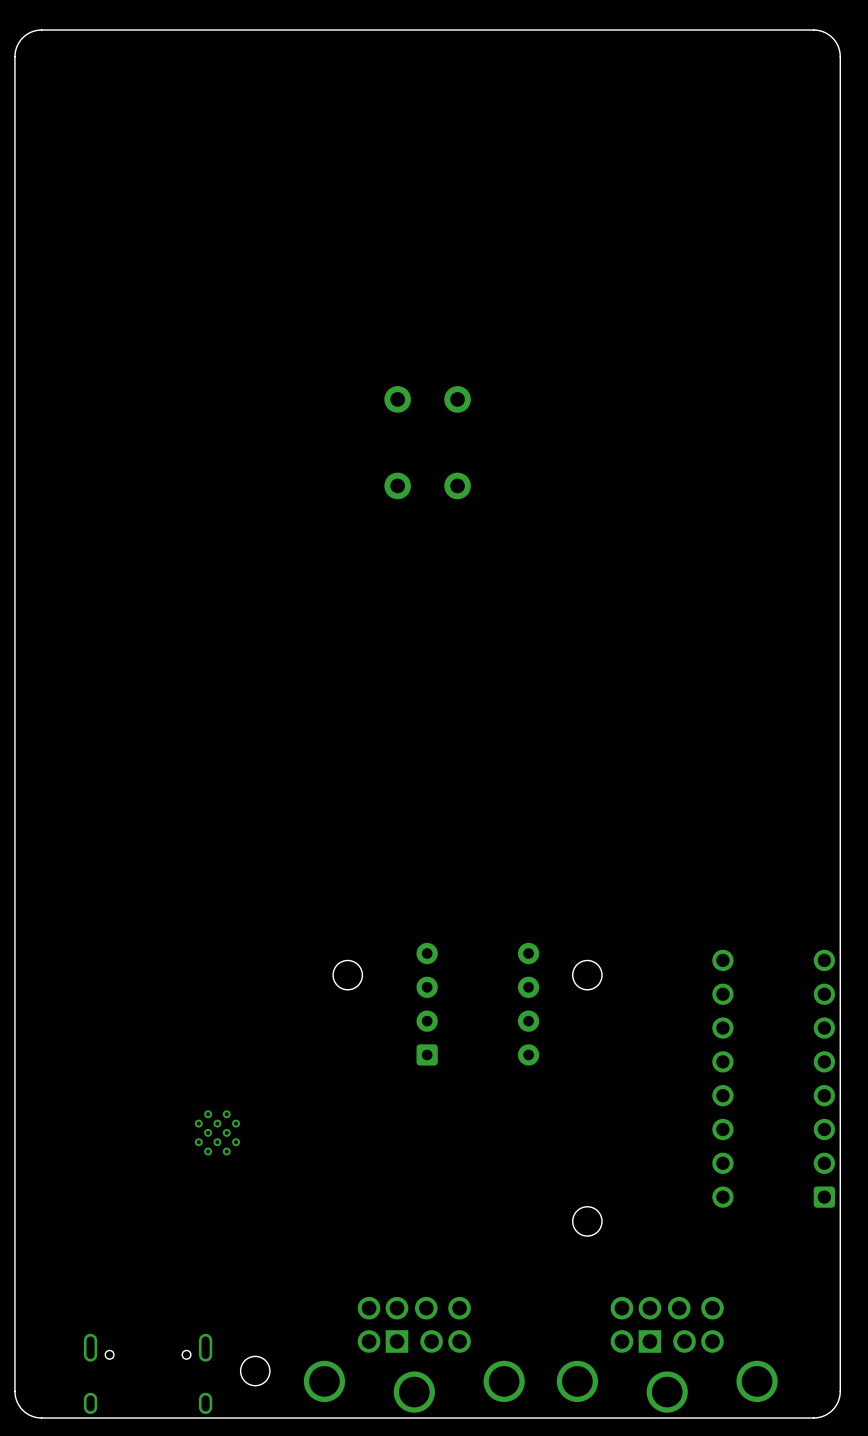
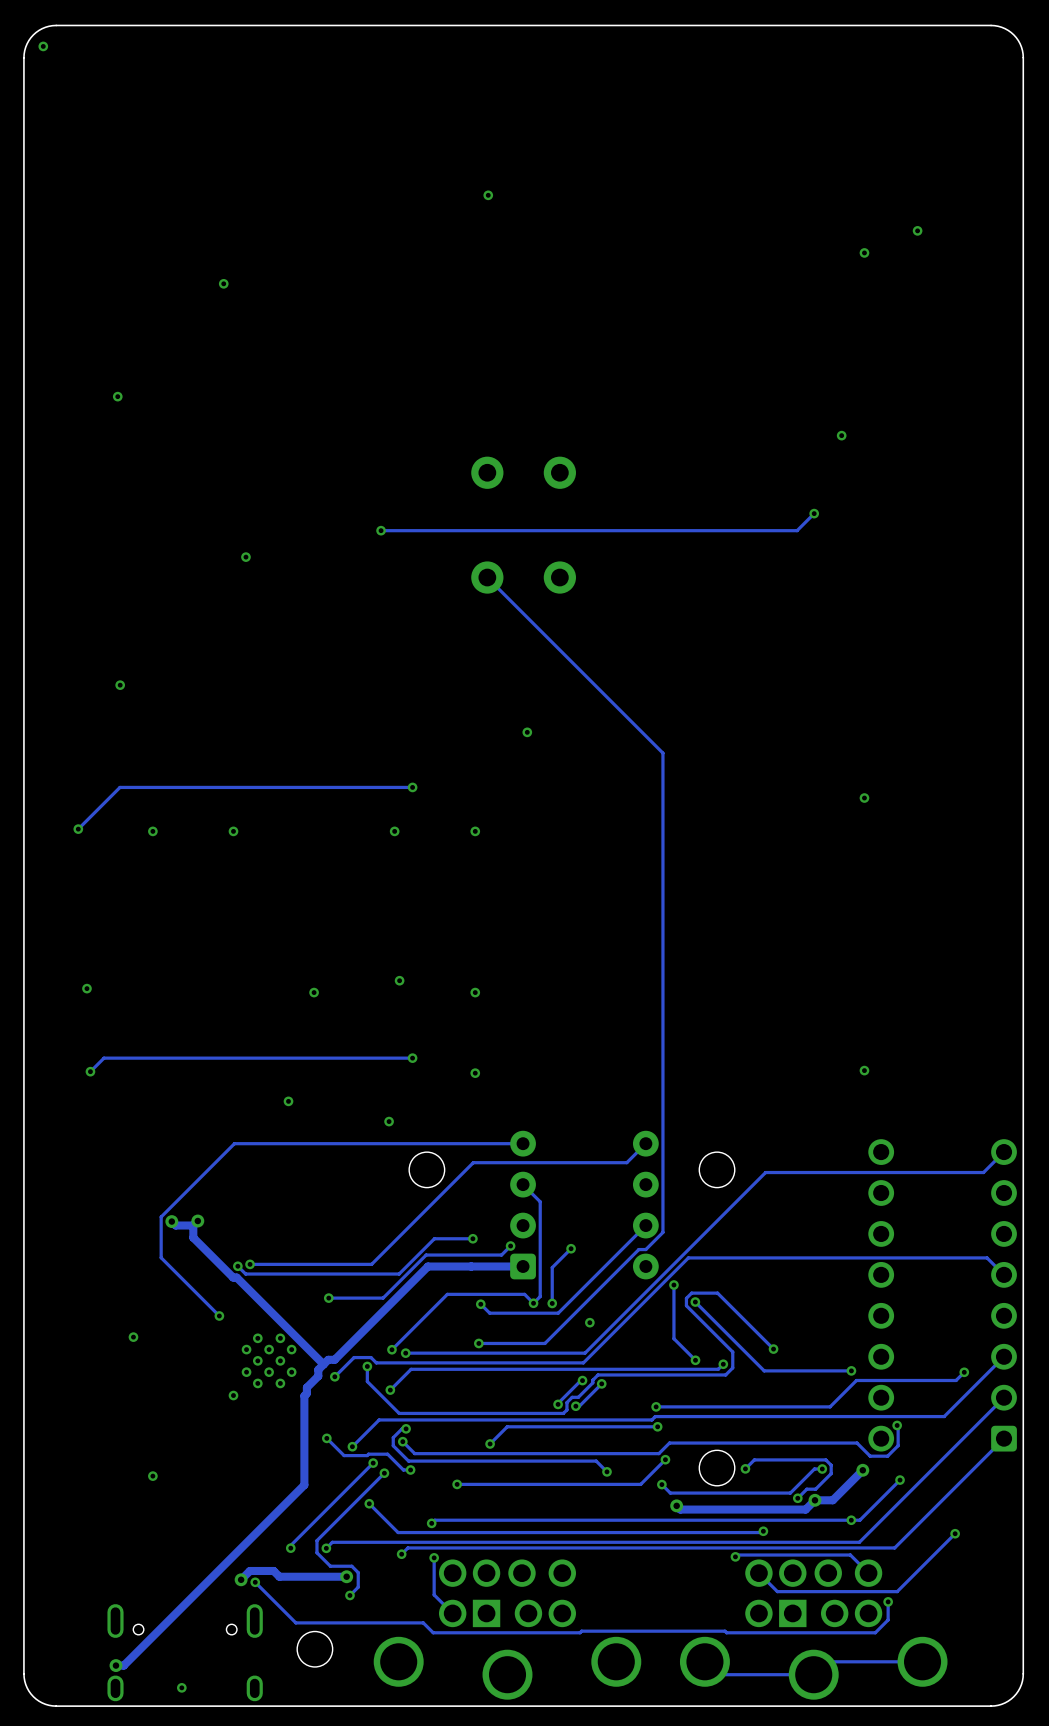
via: none -> (43, 46)
via: none -> (488, 195)
via: none -> (917, 230)
via: none -> (864, 252)
via: none -> (223, 283)
via: none -> (117, 396)
via: none -> (841, 435)
track: none -> (814, 513) (797, 530) (381, 530)
via: none -> (814, 513)
via: none -> (381, 530)
via: none -> (245, 557)
track: none -> (487, 577) (662, 753) (662, 1232) (645, 1249) (638, 1249) (544, 1343) (478, 1343)
via: none -> (120, 685)
via: none -> (527, 732)
track: none -> (412, 787) (119, 787) (78, 829)
via: none -> (412, 787)
via: none -> (864, 798)
via: none -> (78, 829)
via: none -> (152, 831)
via: none -> (233, 831)
via: none -> (394, 831)
via: none -> (475, 831)
via: none -> (399, 980)
via: none -> (86, 988)
via: none -> (314, 992)
via: none -> (475, 992)
track: none -> (412, 1058) (103, 1058) (90, 1071)
via: none -> (412, 1058)
via: none -> (864, 1070)
via: none -> (90, 1071)
via: none -> (475, 1073)
via: none -> (288, 1101)
via: none -> (389, 1121)
track: none -> (523, 1143) (234, 1143) (161, 1216) (161, 1257) (219, 1315)
track: none -> (645, 1143) (626, 1162) (473, 1162) (371, 1264) (250, 1264)
track: none -> (1004, 1152) (983, 1172) (765, 1172) (584, 1353) (405, 1353)
track: none -> (523, 1184) (540, 1201) (540, 1296) (533, 1303) (524, 1294) (447, 1294) (391, 1349)
track: none -> (171, 1221) (175, 1225) (193, 1225)
via: none -> (171, 1221)
via: none -> (197, 1221)
track: none -> (193, 1225) (193, 1237) (233, 1277) (236, 1277) (323, 1364)
track: none -> (645, 1225) (558, 1313) (489, 1313) (480, 1304)
track: none -> (472, 1238) (434, 1238) (399, 1274) (245, 1274) (237, 1266)
via: none -> (472, 1238)
track: none -> (510, 1246) (501, 1255) (426, 1255) (383, 1298) (328, 1298)
via: none -> (510, 1246)
track: none -> (571, 1248) (552, 1267) (552, 1303)
via: none -> (571, 1248)
via: none -> (250, 1264)
via: none -> (237, 1266)
track: none -> (523, 1266) (427, 1266) (334, 1359) (328, 1359) (323, 1364)
track: none -> (1004, 1274) (987, 1257) (688, 1257) (583, 1362) (376, 1362) (371, 1357) (354, 1357) (334, 1376)
track: none -> (673, 1285) (673, 1338) (695, 1360)
via: none -> (673, 1285)
via: none -> (328, 1298)
track: none -> (695, 1302) (764, 1370) (851, 1370)
via: none -> (695, 1302)
via: none -> (533, 1303)
via: none -> (552, 1303)
via: none -> (480, 1304)
via: none -> (219, 1315)
via: none -> (589, 1322)
via: none -> (133, 1337)
via: none -> (478, 1343)
via: none -> (391, 1349)
track: none -> (773, 1349) (717, 1293) (691, 1293) (686, 1298) (686, 1305) (732, 1352) (732, 1367) (725, 1374) (598, 1374) (578, 1397) (572, 1397) (566, 1402) (566, 1409) (563, 1413) (399, 1413) (367, 1381) (367, 1366)
via: none -> (773, 1349)
via: none -> (405, 1353)
track: none -> (1004, 1356) (944, 1416) (655, 1416) (651, 1419) (379, 1419) (352, 1446)
via: none -> (695, 1360)
track: none -> (323, 1364) (318, 1369) (318, 1376) (306, 1387) (306, 1393) (304, 1395) (304, 1485) (123, 1665) (115, 1665)
track: none -> (723, 1364) (718, 1369) (411, 1369) (390, 1390)
via: none -> (723, 1364)
via: none -> (367, 1366)
via: none -> (851, 1370)
track: none -> (964, 1372) (956, 1380) (856, 1380) (830, 1406) (656, 1406)
via: none -> (964, 1372)
via: none -> (334, 1376)
track: none -> (582, 1380) (558, 1404)
via: none -> (582, 1380)
track: none -> (601, 1383) (579, 1406) (575, 1406)
via: none -> (601, 1383)
via: none -> (390, 1390)
via: none -> (233, 1395)
track: none -> (1004, 1397) (859, 1542) (332, 1542) (326, 1548)
via: none -> (558, 1404)
via: none -> (575, 1406)
via: none -> (656, 1406)
track: none -> (897, 1425) (898, 1445) (887, 1456) (870, 1456) (857, 1443) (669, 1443) (658, 1453) (414, 1453) (402, 1441)
via: none -> (897, 1425)
track: none -> (657, 1426) (507, 1426) (490, 1443)
via: none -> (657, 1426)
track: none -> (406, 1428) (402, 1428) (393, 1437) (393, 1445) (408, 1461) (596, 1461) (607, 1471)
via: none -> (406, 1428)
track: none -> (326, 1438) (344, 1455) (387, 1454) (403, 1469) (410, 1469)
via: none -> (326, 1438)
track: none -> (1004, 1438) (894, 1547) (407, 1547) (401, 1554)
via: none -> (402, 1441)
via: none -> (490, 1443)
via: none -> (352, 1446)
track: none -> (665, 1459) (640, 1484) (457, 1484)
via: none -> (665, 1459)
track: none -> (373, 1463) (290, 1545) (290, 1548)
via: none -> (373, 1463)
track: none -> (745, 1468) (754, 1459) (825, 1459) (831, 1465) (831, 1473) (815, 1489) (806, 1489) (797, 1498)
via: none -> (745, 1468)
track: none -> (822, 1469) (814, 1469) (790, 1493) (670, 1493) (661, 1484)
via: none -> (822, 1469)
via: none -> (410, 1469)
track: none -> (862, 1470) (832, 1500) (814, 1500) (805, 1509) (680, 1509) (676, 1505)
via: none -> (862, 1470)
via: none -> (607, 1471)
track: none -> (384, 1473) (316, 1540) (316, 1552) (330, 1566) (351, 1566) (358, 1572) (358, 1587) (349, 1595)
via: none -> (384, 1473)
via: none -> (152, 1476)
track: none -> (900, 1480) (859, 1520) (434, 1520) (431, 1523)
via: none -> (900, 1480)
via: none -> (457, 1484)
via: none -> (661, 1484)
via: none -> (797, 1498)
via: none -> (814, 1500)
track: none -> (369, 1503) (398, 1532) (763, 1531)
via: none -> (369, 1503)
via: none -> (676, 1505)
via: none -> (851, 1520)
via: none -> (431, 1523)
via: none -> (763, 1531)
track: none -> (955, 1533) (897, 1591) (777, 1591) (758, 1573)
via: none -> (955, 1533)
via: none -> (290, 1548)
via: none -> (326, 1548)
via: none -> (401, 1554)
track: none -> (735, 1556) (737, 1555) (850, 1555) (868, 1573)
via: none -> (735, 1556)
track: none -> (434, 1557) (434, 1594) (452, 1613)
via: none -> (434, 1557)
track: none -> (346, 1576) (279, 1576) (273, 1570) (249, 1570) (241, 1579)
via: none -> (346, 1576)
via: none -> (241, 1579)
track: none -> (255, 1582) (295, 1622) (423, 1622) (433, 1632) (580, 1632) (581, 1631) (875, 1632) (888, 1619) (888, 1601)
via: none -> (255, 1582)
via: none -> (349, 1595)
via: none -> (888, 1601)
track: none -> (922, 1661) (826, 1661) (813, 1674) (717, 1674) (704, 1661)
via: none -> (115, 1665)
via: none -> (181, 1687)

